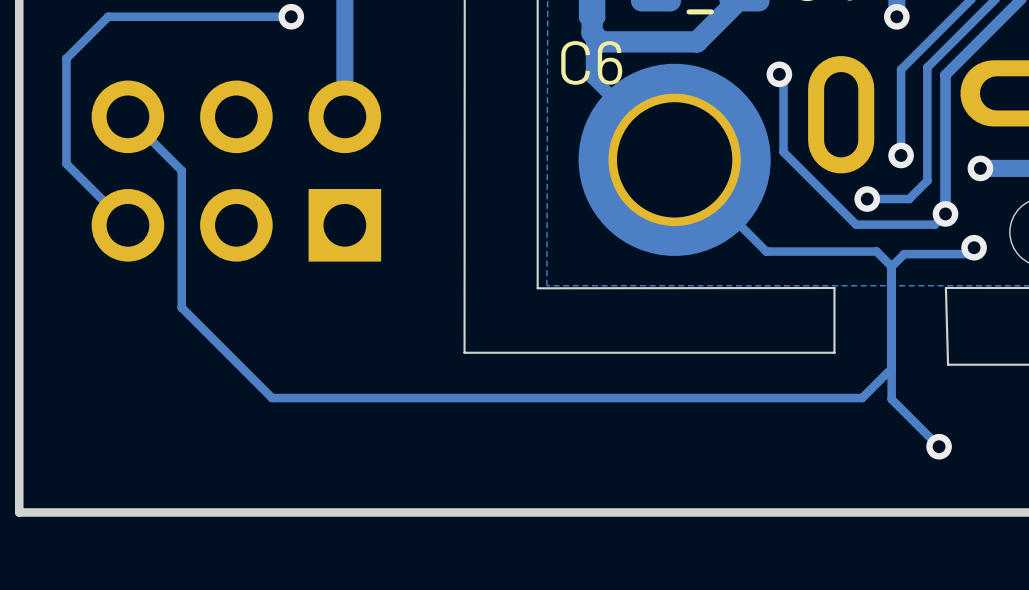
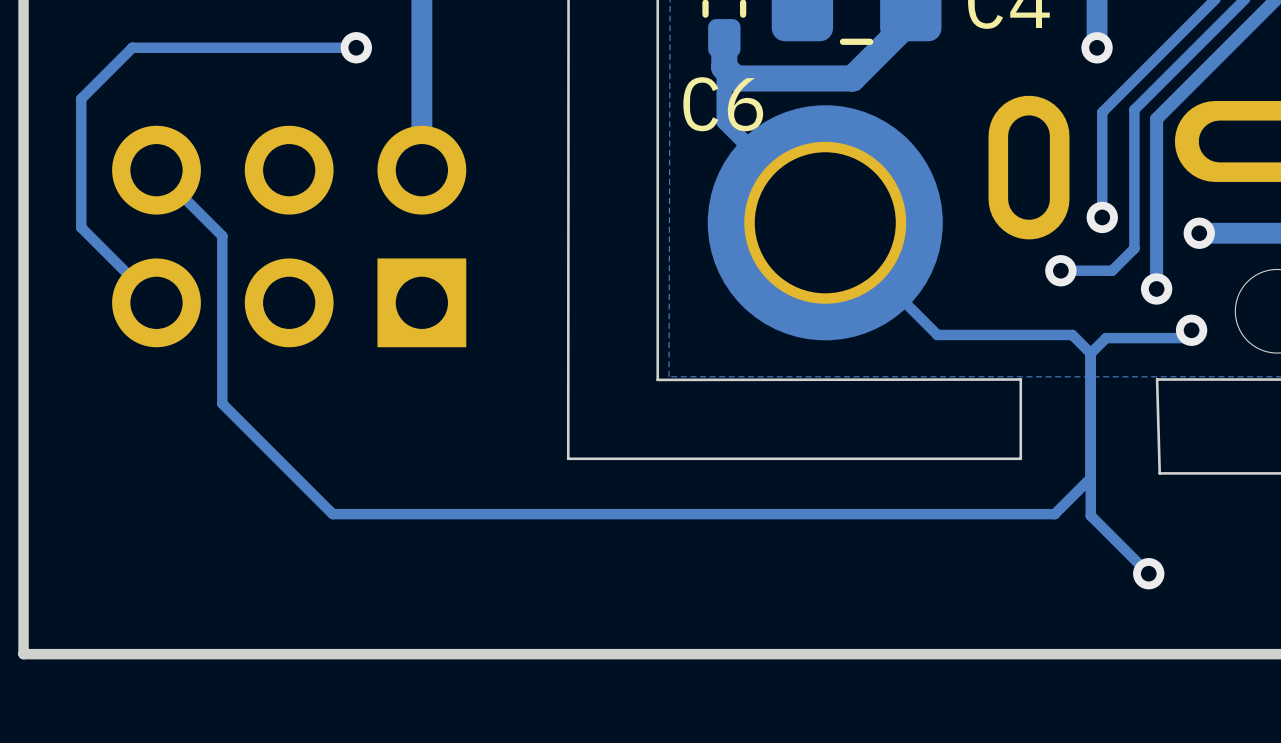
track: (779, 74) (783, 78) (783, 152) (856, 224) (934, 224) (945, 213) -> none
via: (779, 74) -> none

